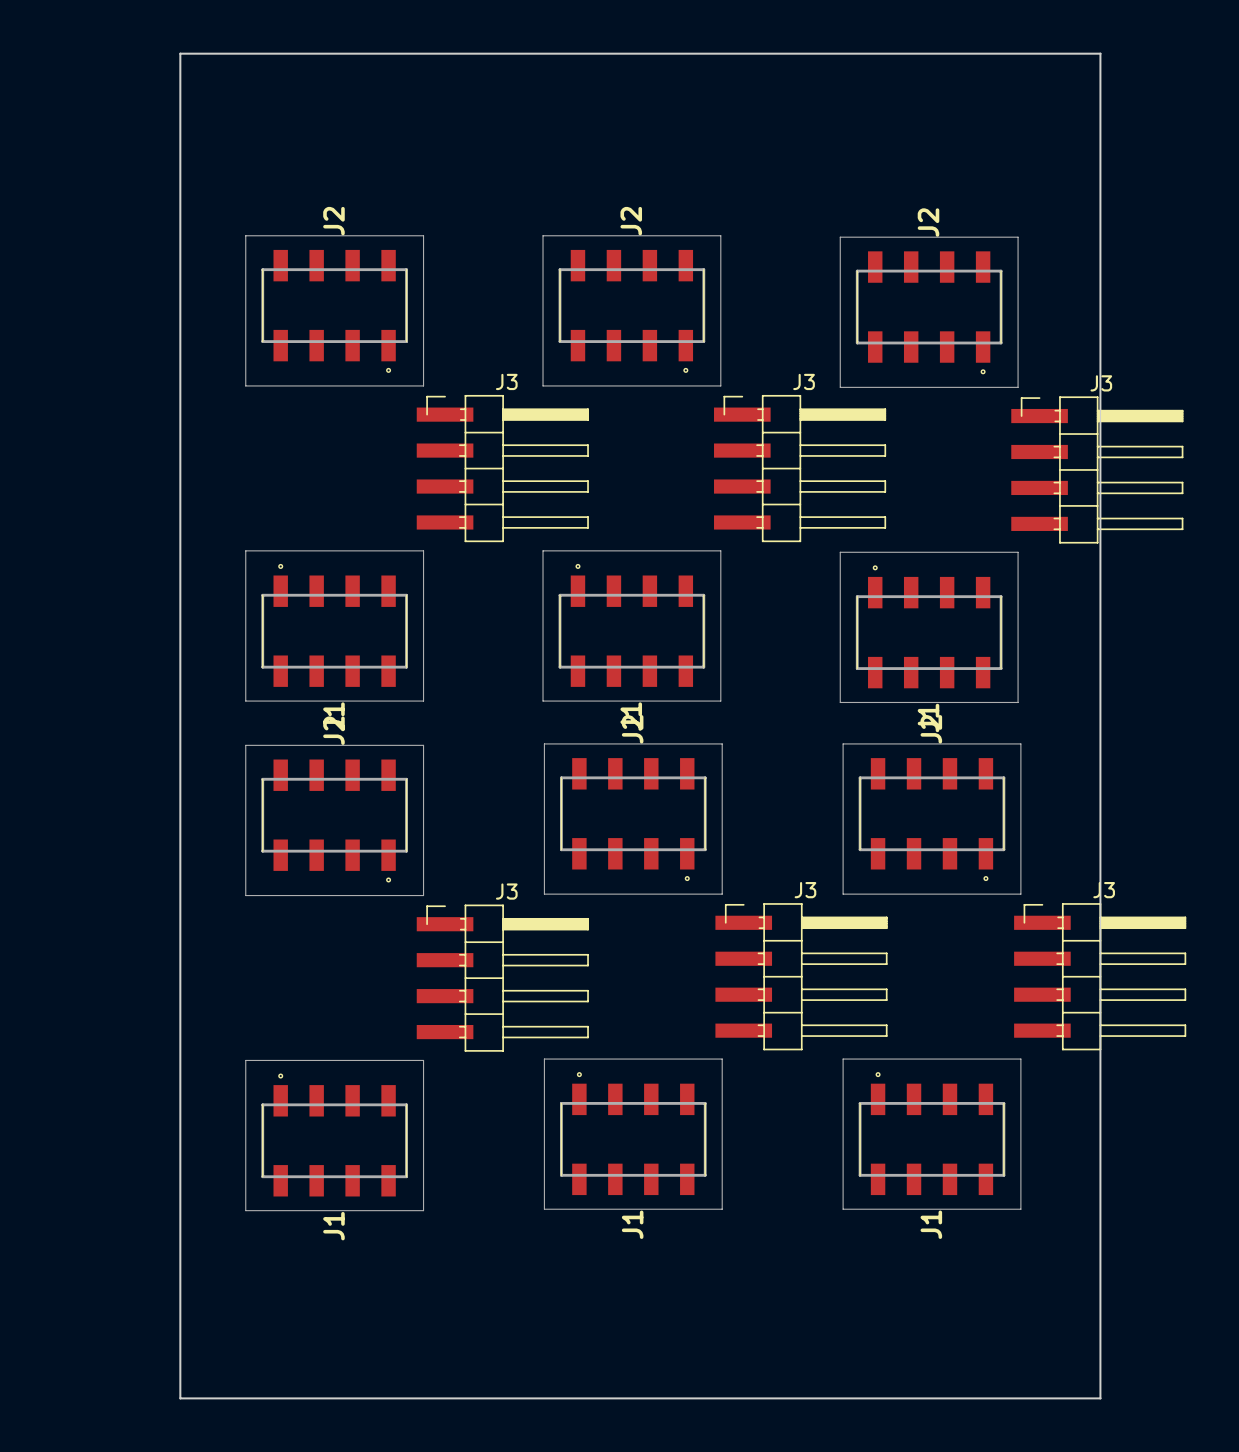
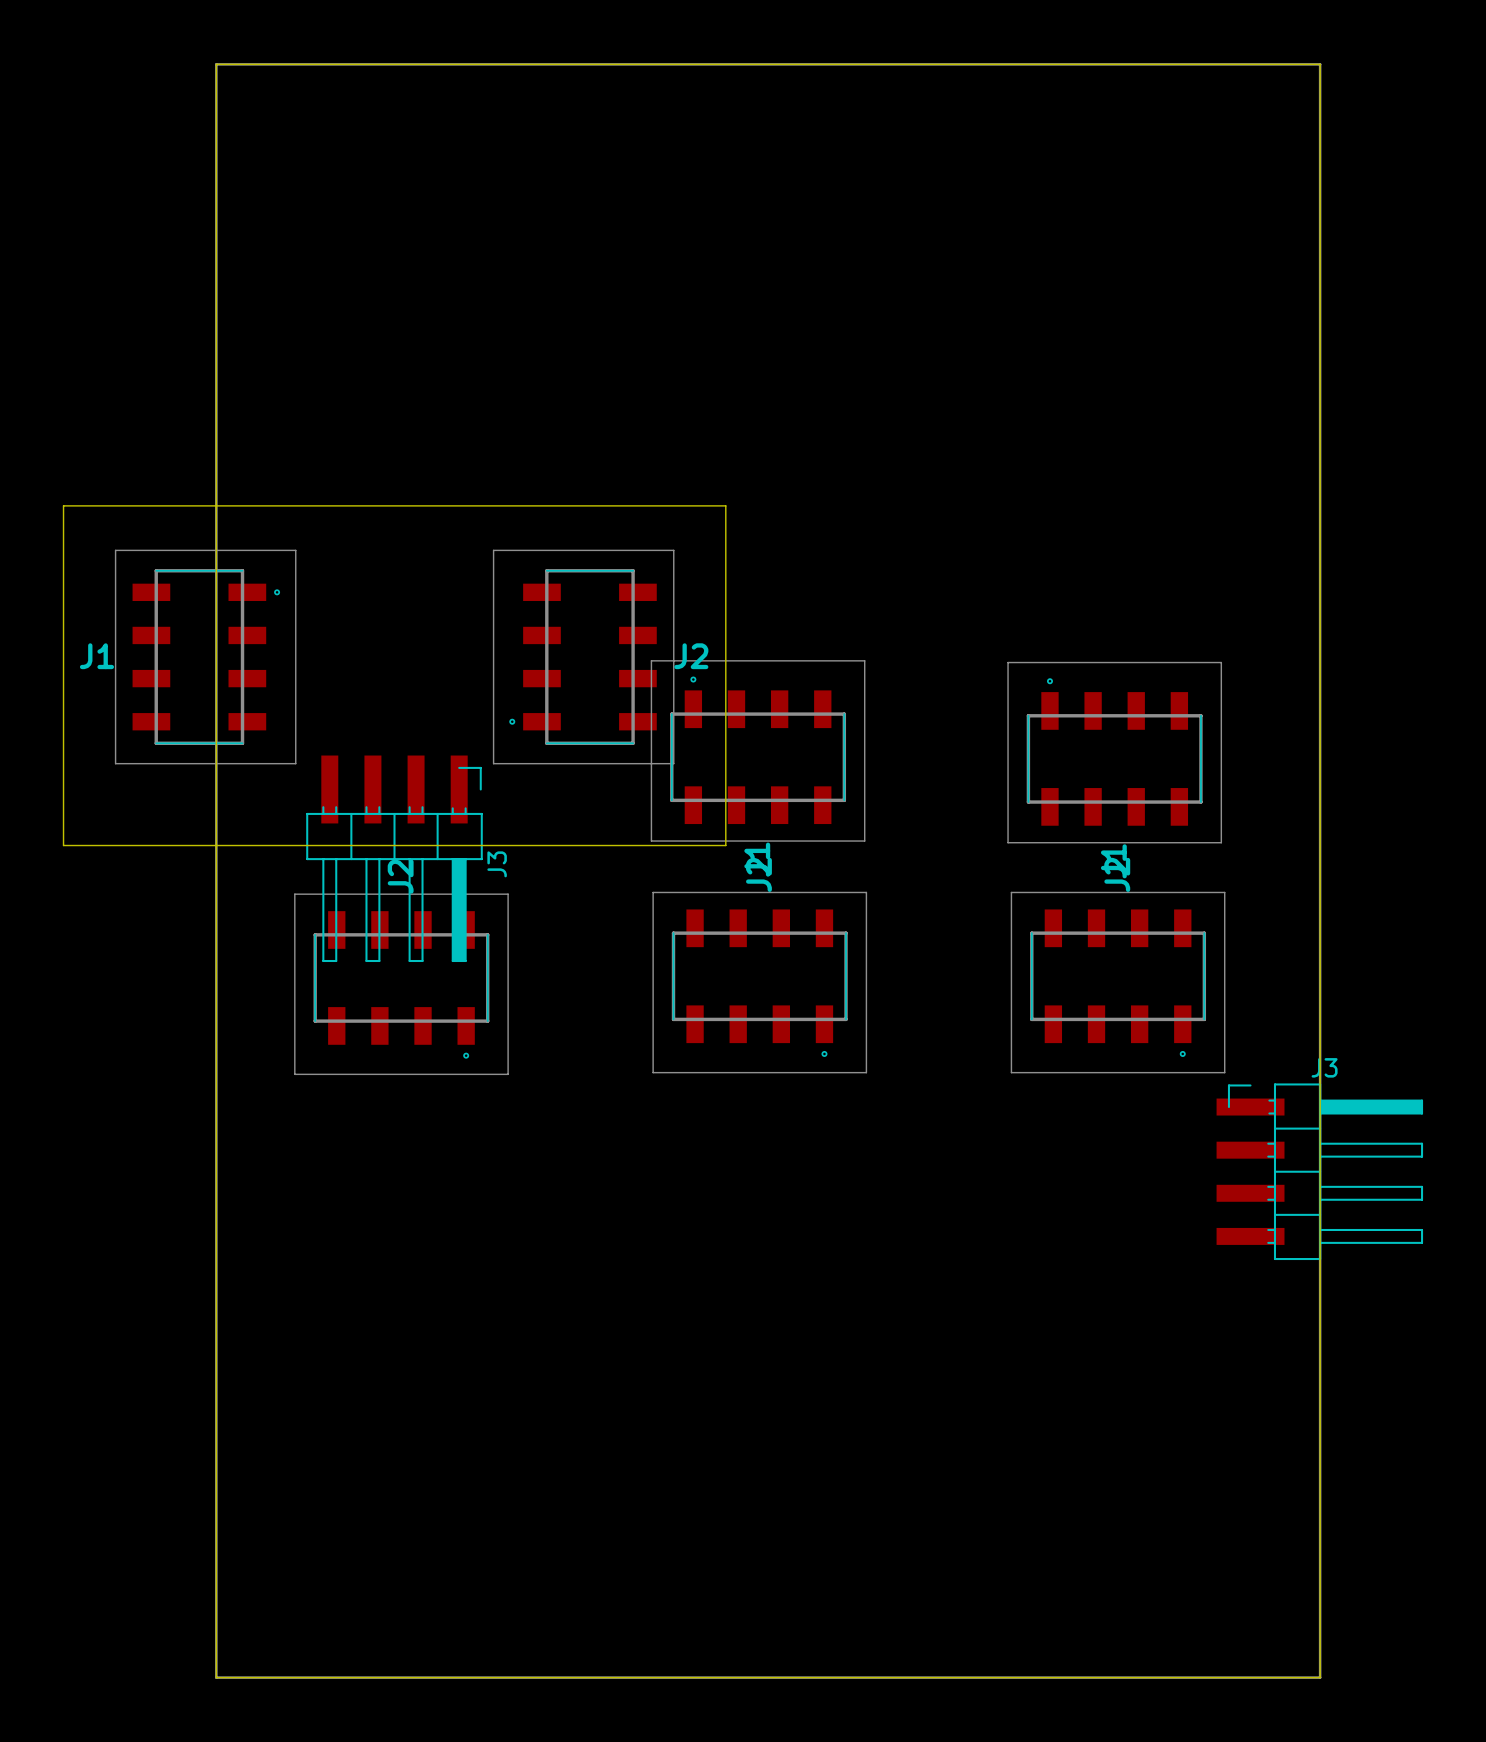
J2: (334, 310) -> none
J2: (631, 310) -> none
J2: (929, 312) -> none
board edge: none -> (63, 505) (63, 845) (725, 845) (725, 505) (63, 505)
J3: (502, 468) -> none
J3: (800, 468) -> none
J3: (1097, 469) -> none
J2: none -> (583, 657)
J1 rotation: 0° (334, 625) -> 90° clockwise (205, 657)
J1 position: (334, 625) -> (205, 657)
J3: none -> (394, 858)
J3: (801, 976) -> none
J3: (502, 978) -> none
J1: (633, 1134) -> none
J1: (932, 1134) -> none
J1: (334, 1135) -> none

